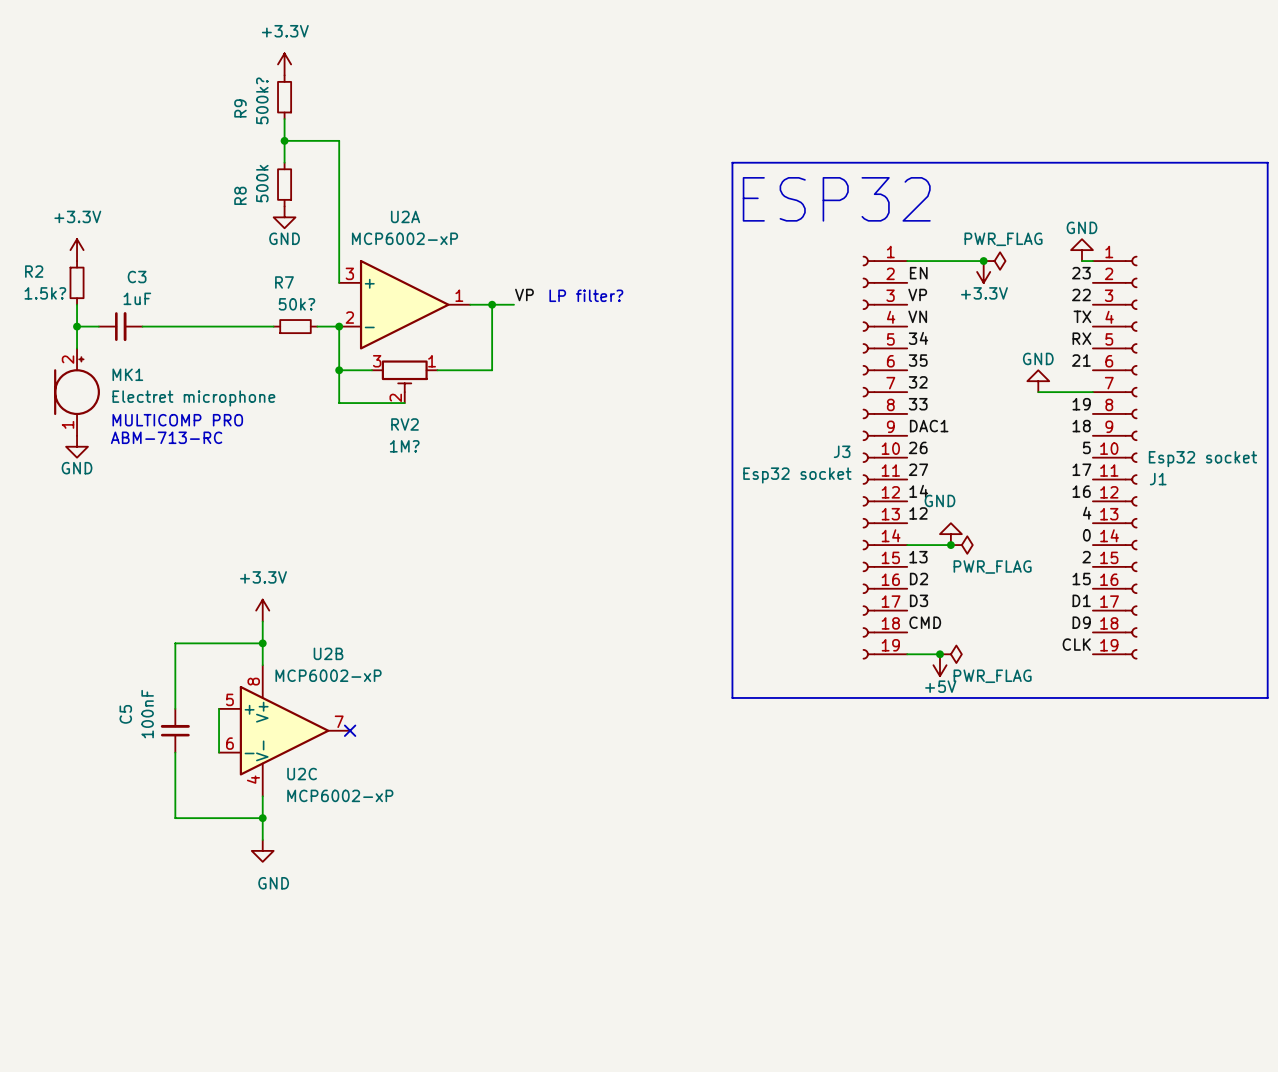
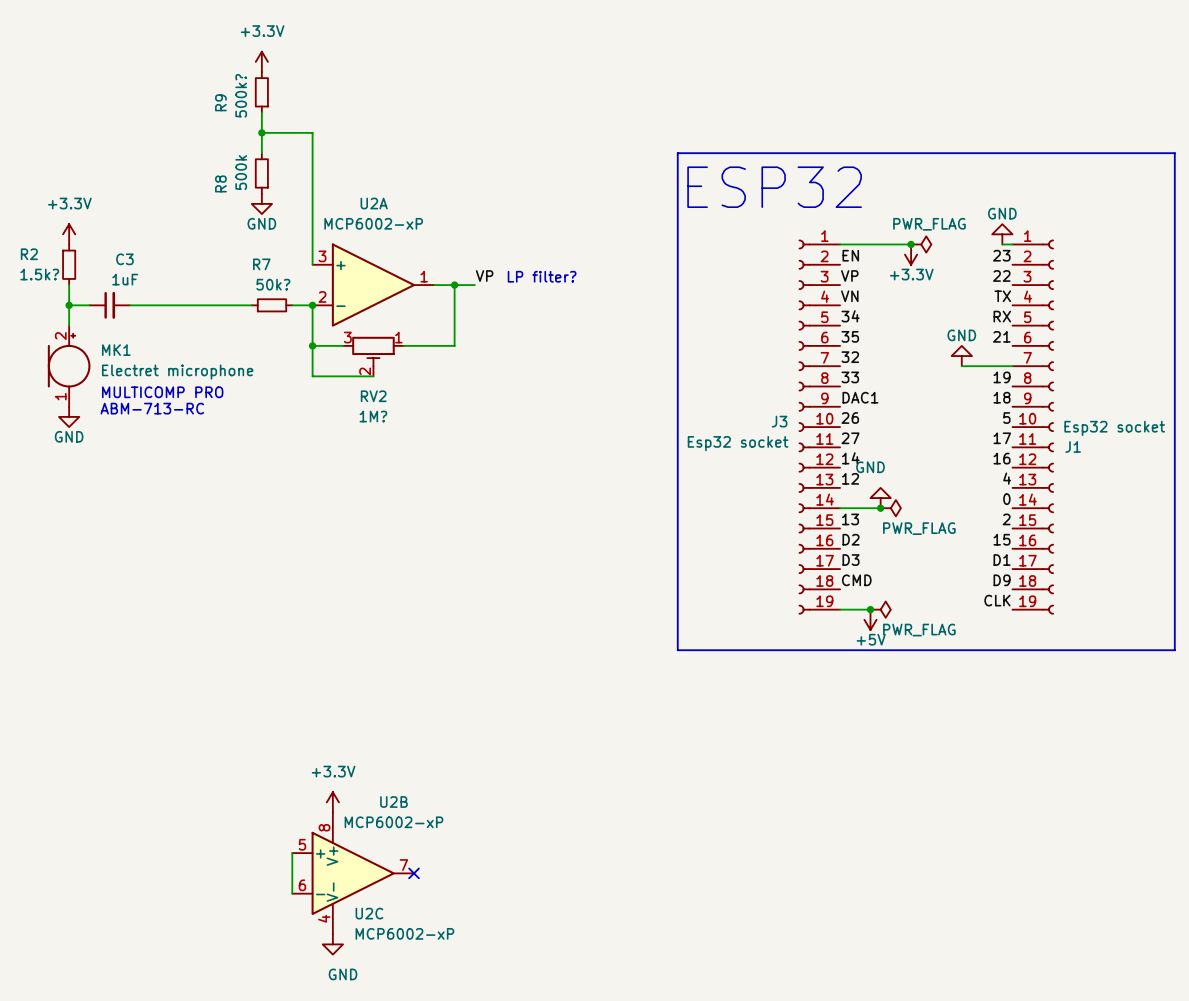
power symbol: +3.3V (262, 610) -> none
wire: (262, 621) (262, 665) -> none
wire: (262, 643) (175, 643) (175, 708) -> none
junction: (262, 643) -> none
wire: (219, 708) (219, 752) -> none
C5: 100nF (175, 730) -> none
U2C position: (262, 730) -> (332, 873)
U2B position: (284, 730) -> (353, 873)
no-connect mark: (350, 730) -> none
wire: (175, 752) (175, 818) (262, 818) -> none
wire: (262, 796) (262, 839) -> (292, 853) (292, 893)
junction: (262, 818) -> none
power symbol position: GND (262, 850) -> GND (332, 944)
power symbol: none -> +3.3V (332, 802)
no-connect mark: none -> (414, 873)

